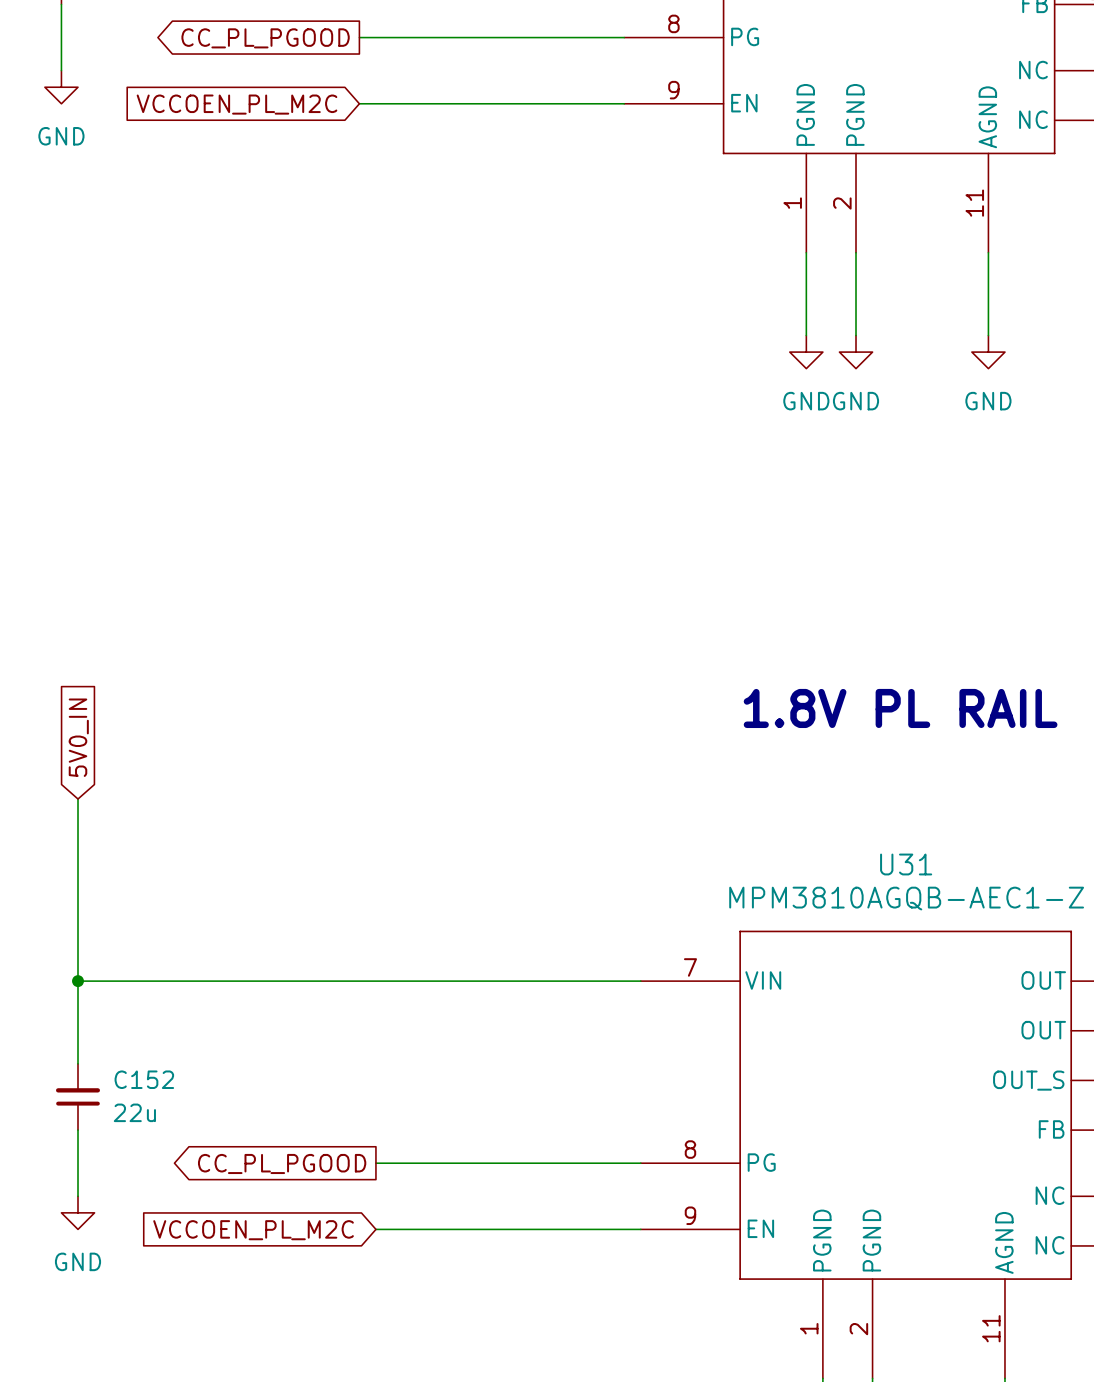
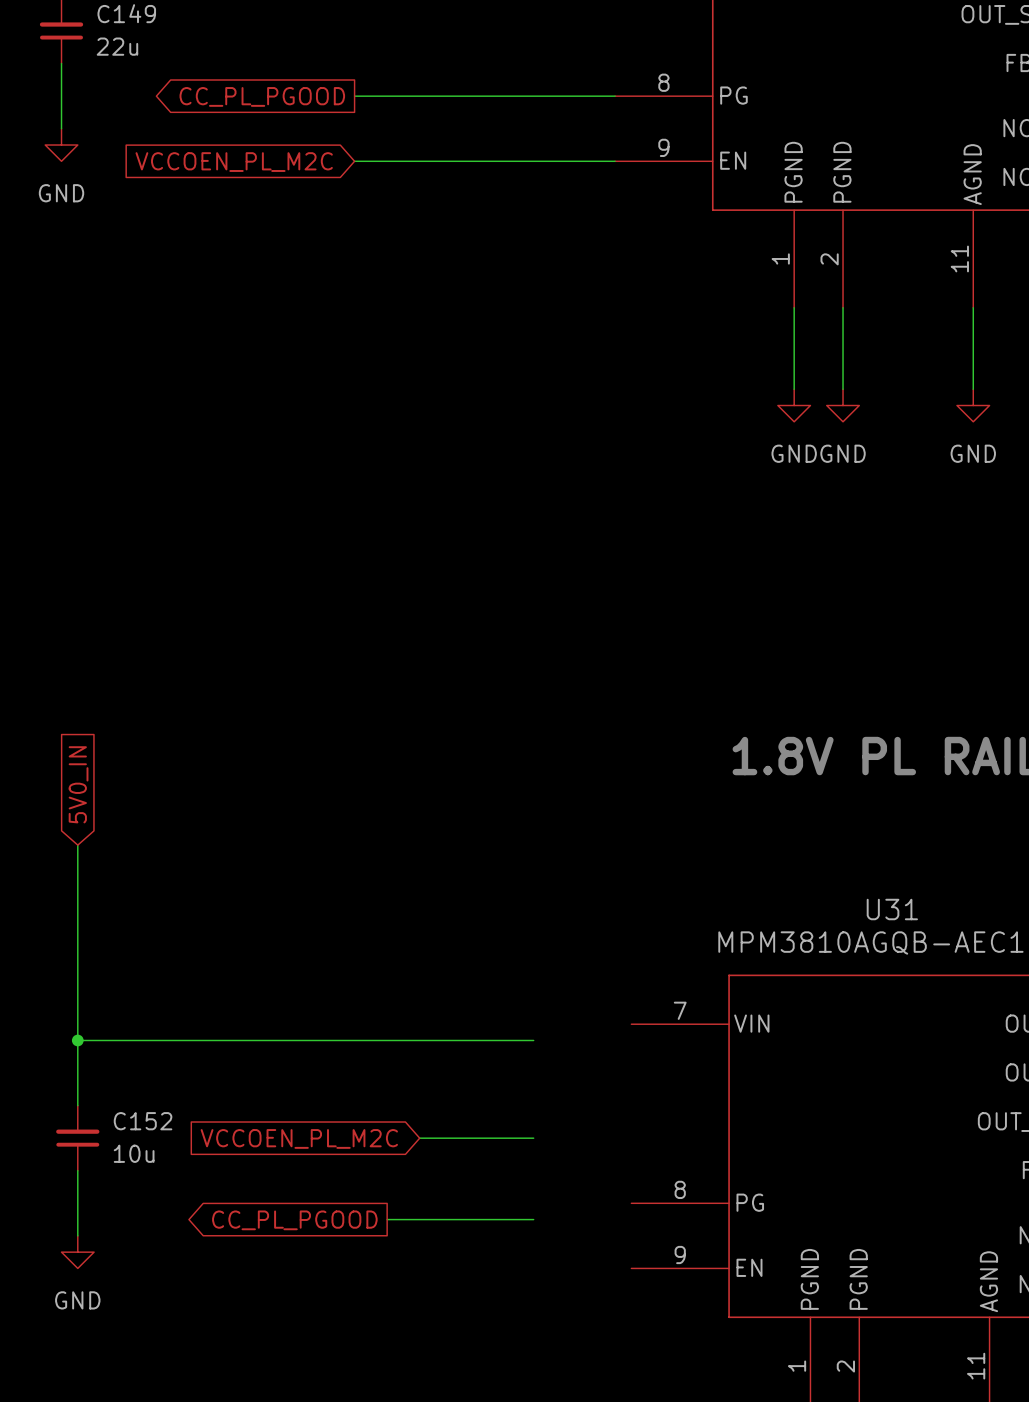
wire: (78, 981) (640, 981) -> none
junction position: (78, 981) -> (77, 1040)
wire: none -> (77, 1040) (533, 1040)
wire: none -> (419, 1138) (533, 1138)
C152 value: 22u (134, 1112) -> 10u (134, 1153)
global label position: CC_PL_PGOOD (282, 1163) -> CC_PL_PGOOD (294, 1220)
wire: (375, 1163) (640, 1163) -> none
wire: none -> (387, 1219) (533, 1219)
wire: (375, 1229) (640, 1229) -> none
global label position: VCCOEN_PL_M2C (253, 1230) -> VCCOEN_PL_M2C (299, 1138)

